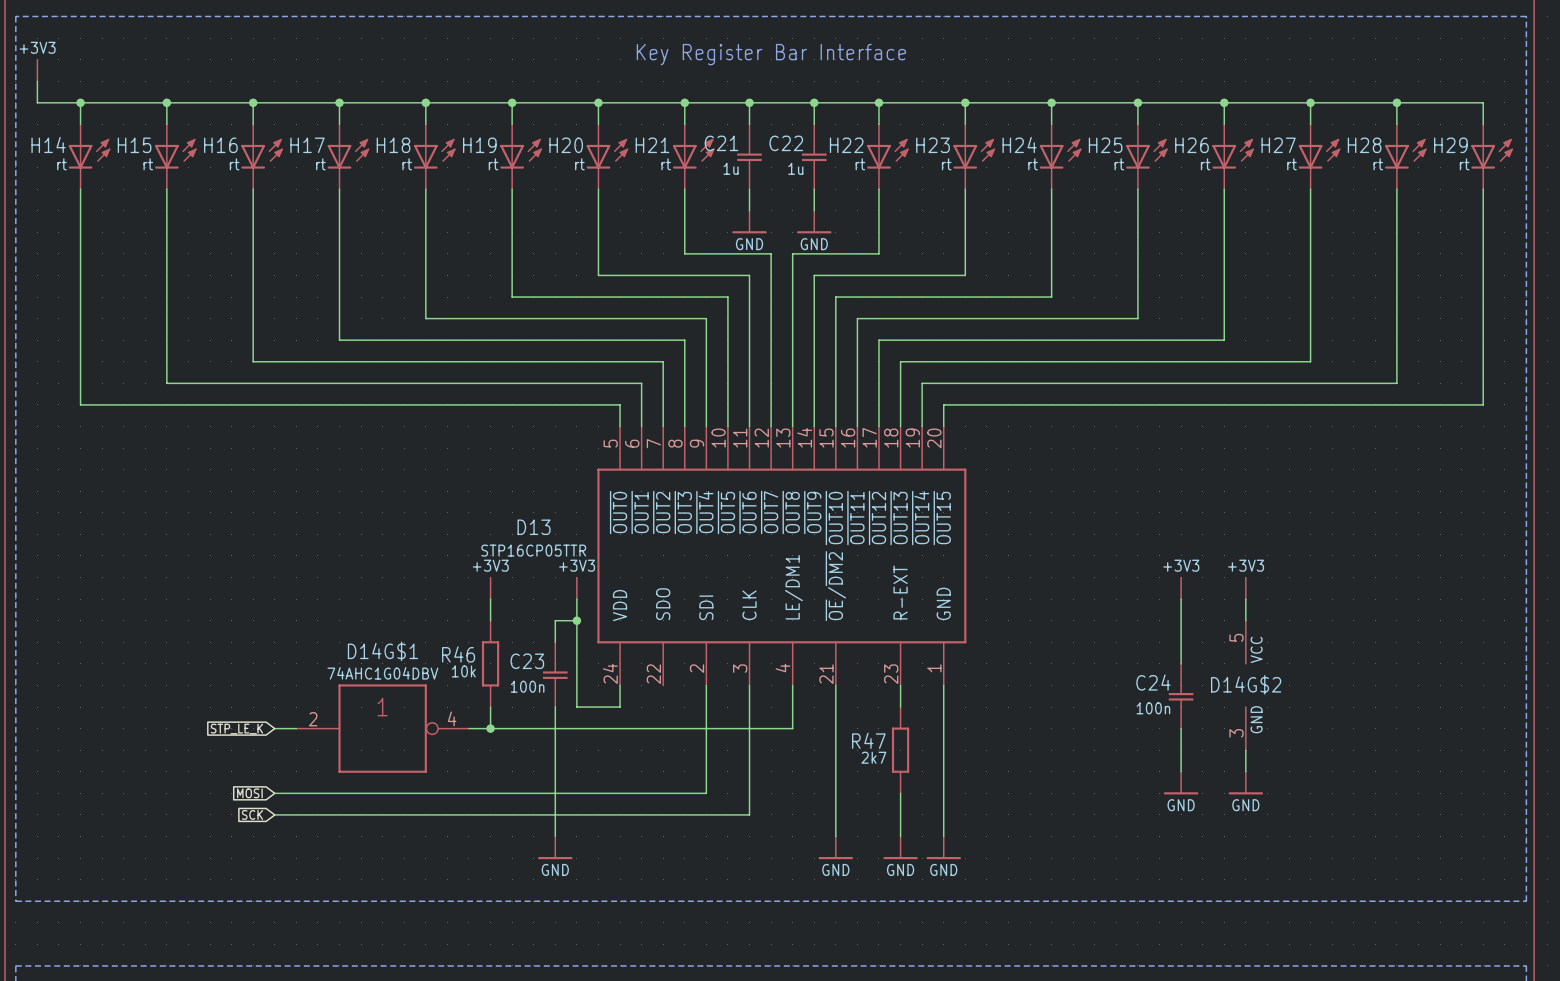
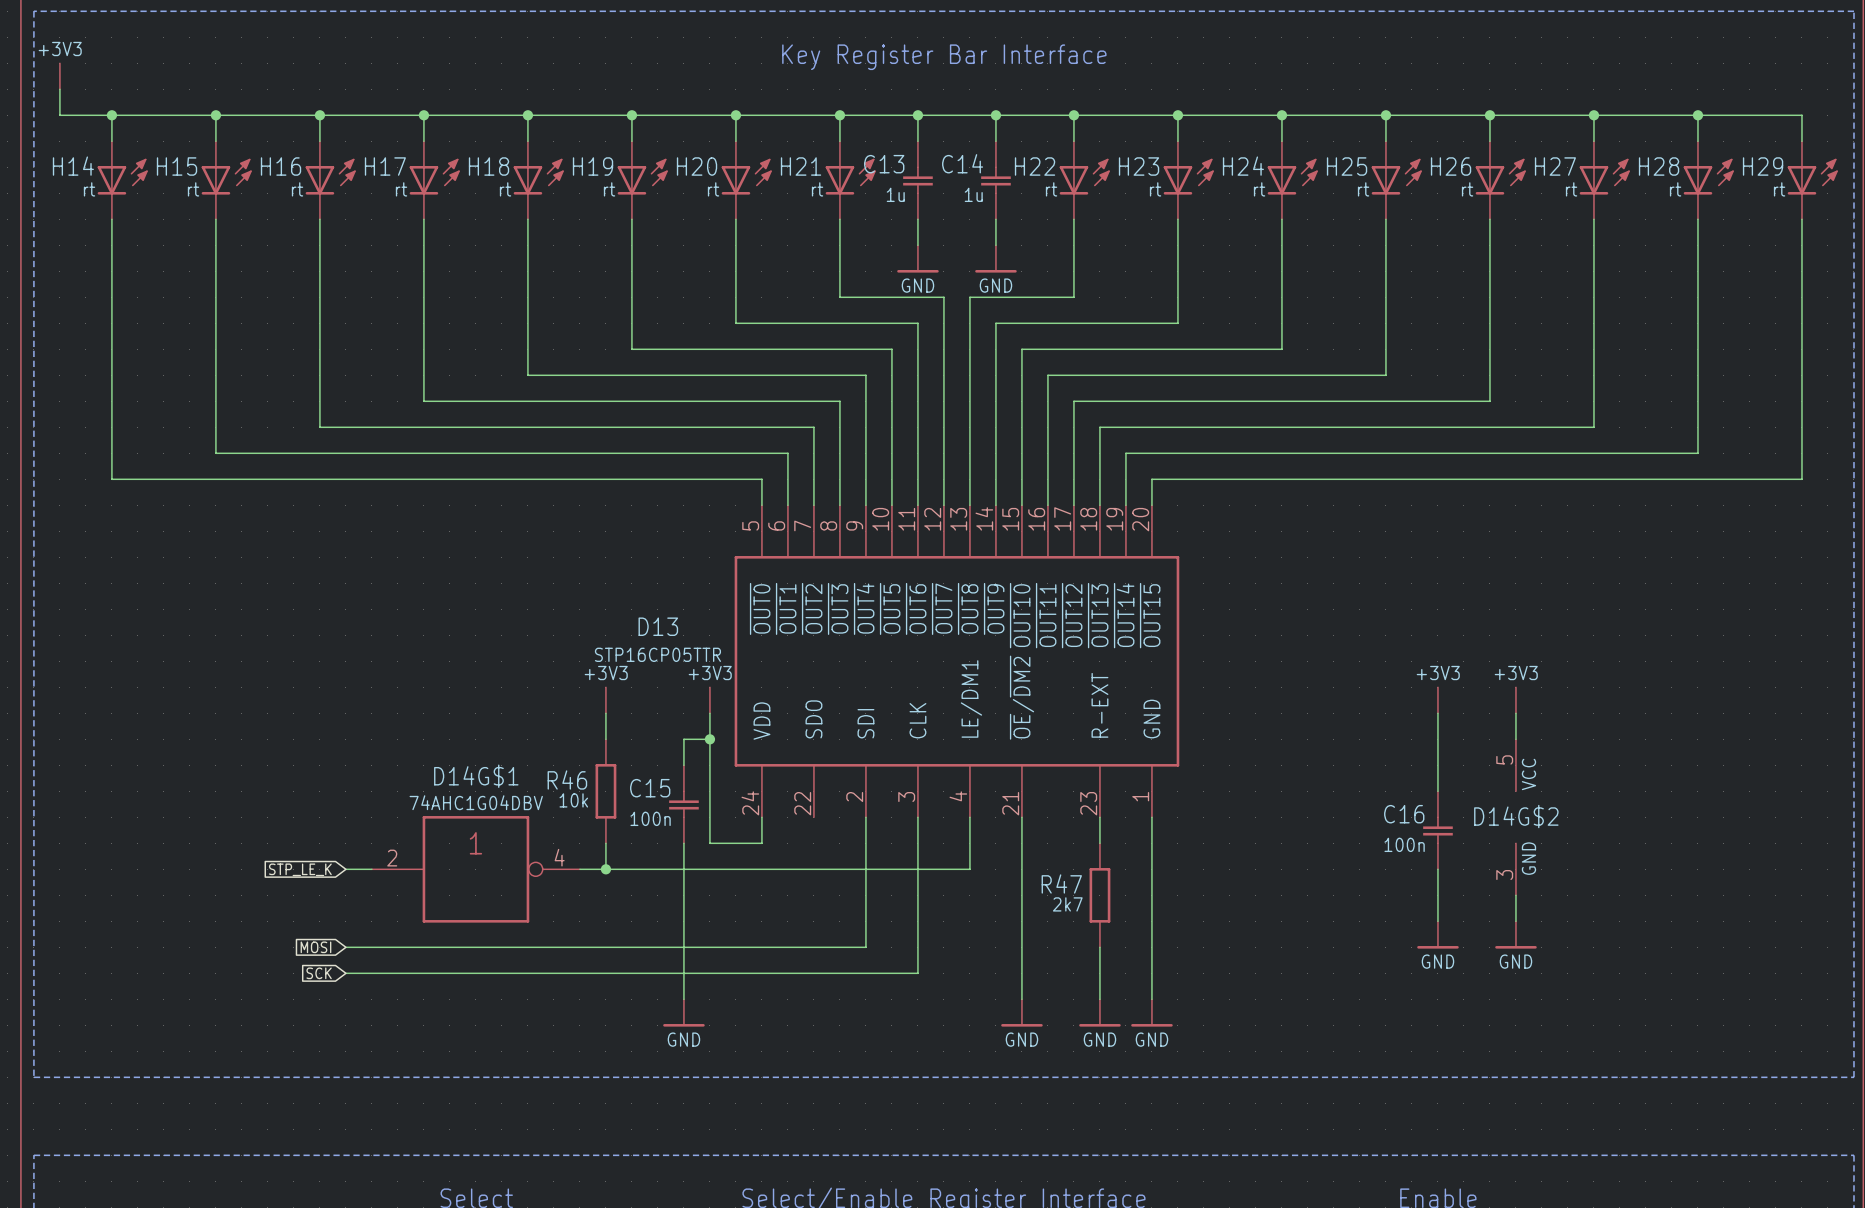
C21 name: C21 (721, 143) -> C13 (884, 164)
C22 name: C22 (786, 143) -> C14 (962, 163)
C23 name: C23 (527, 661) -> C15 (650, 788)
C24 name: C24 (1153, 682) -> C16 (1404, 814)

